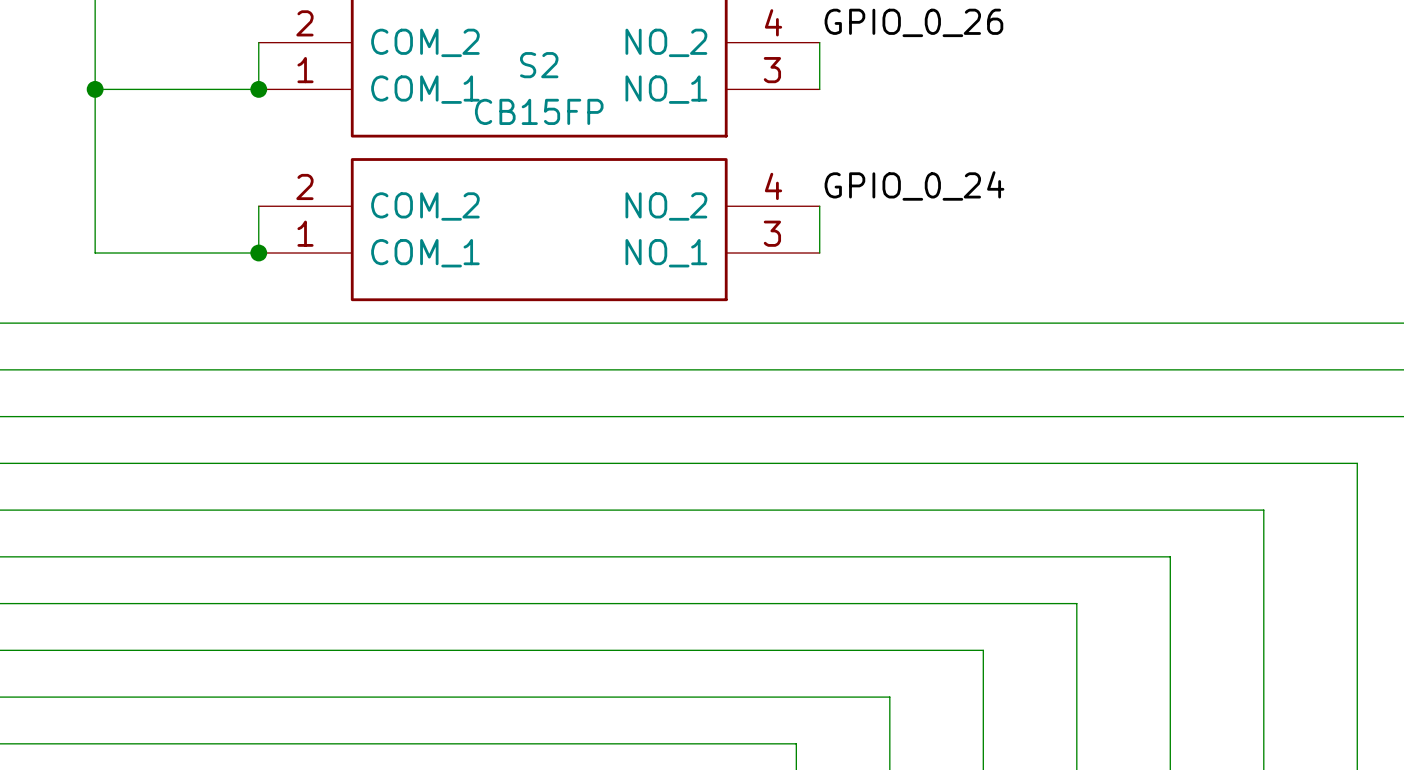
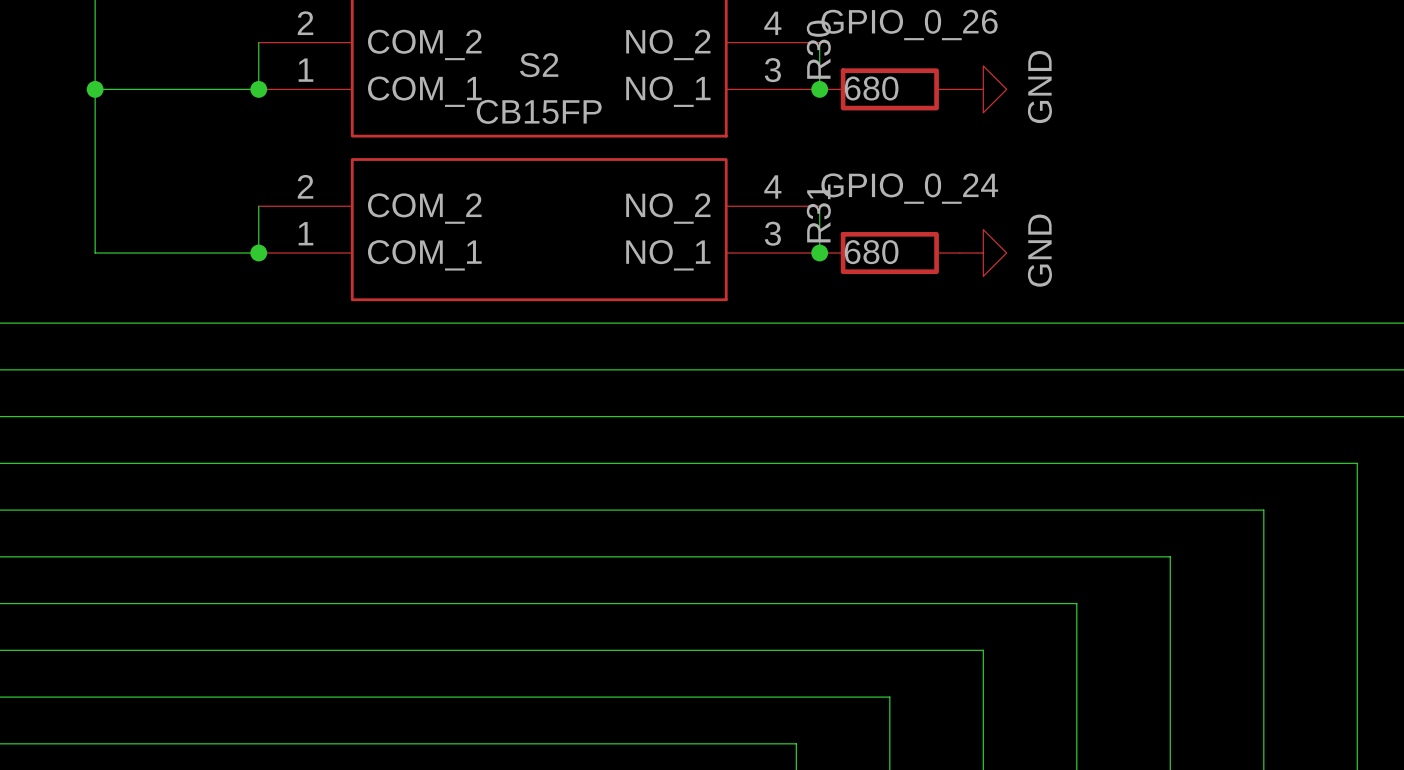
junction: none -> (819, 89)
R30: none -> 680 (889, 89)
power symbol: none -> GND (983, 89)
junction: none -> (819, 253)
R31: none -> 680 (889, 253)
power symbol: none -> GND (983, 253)

